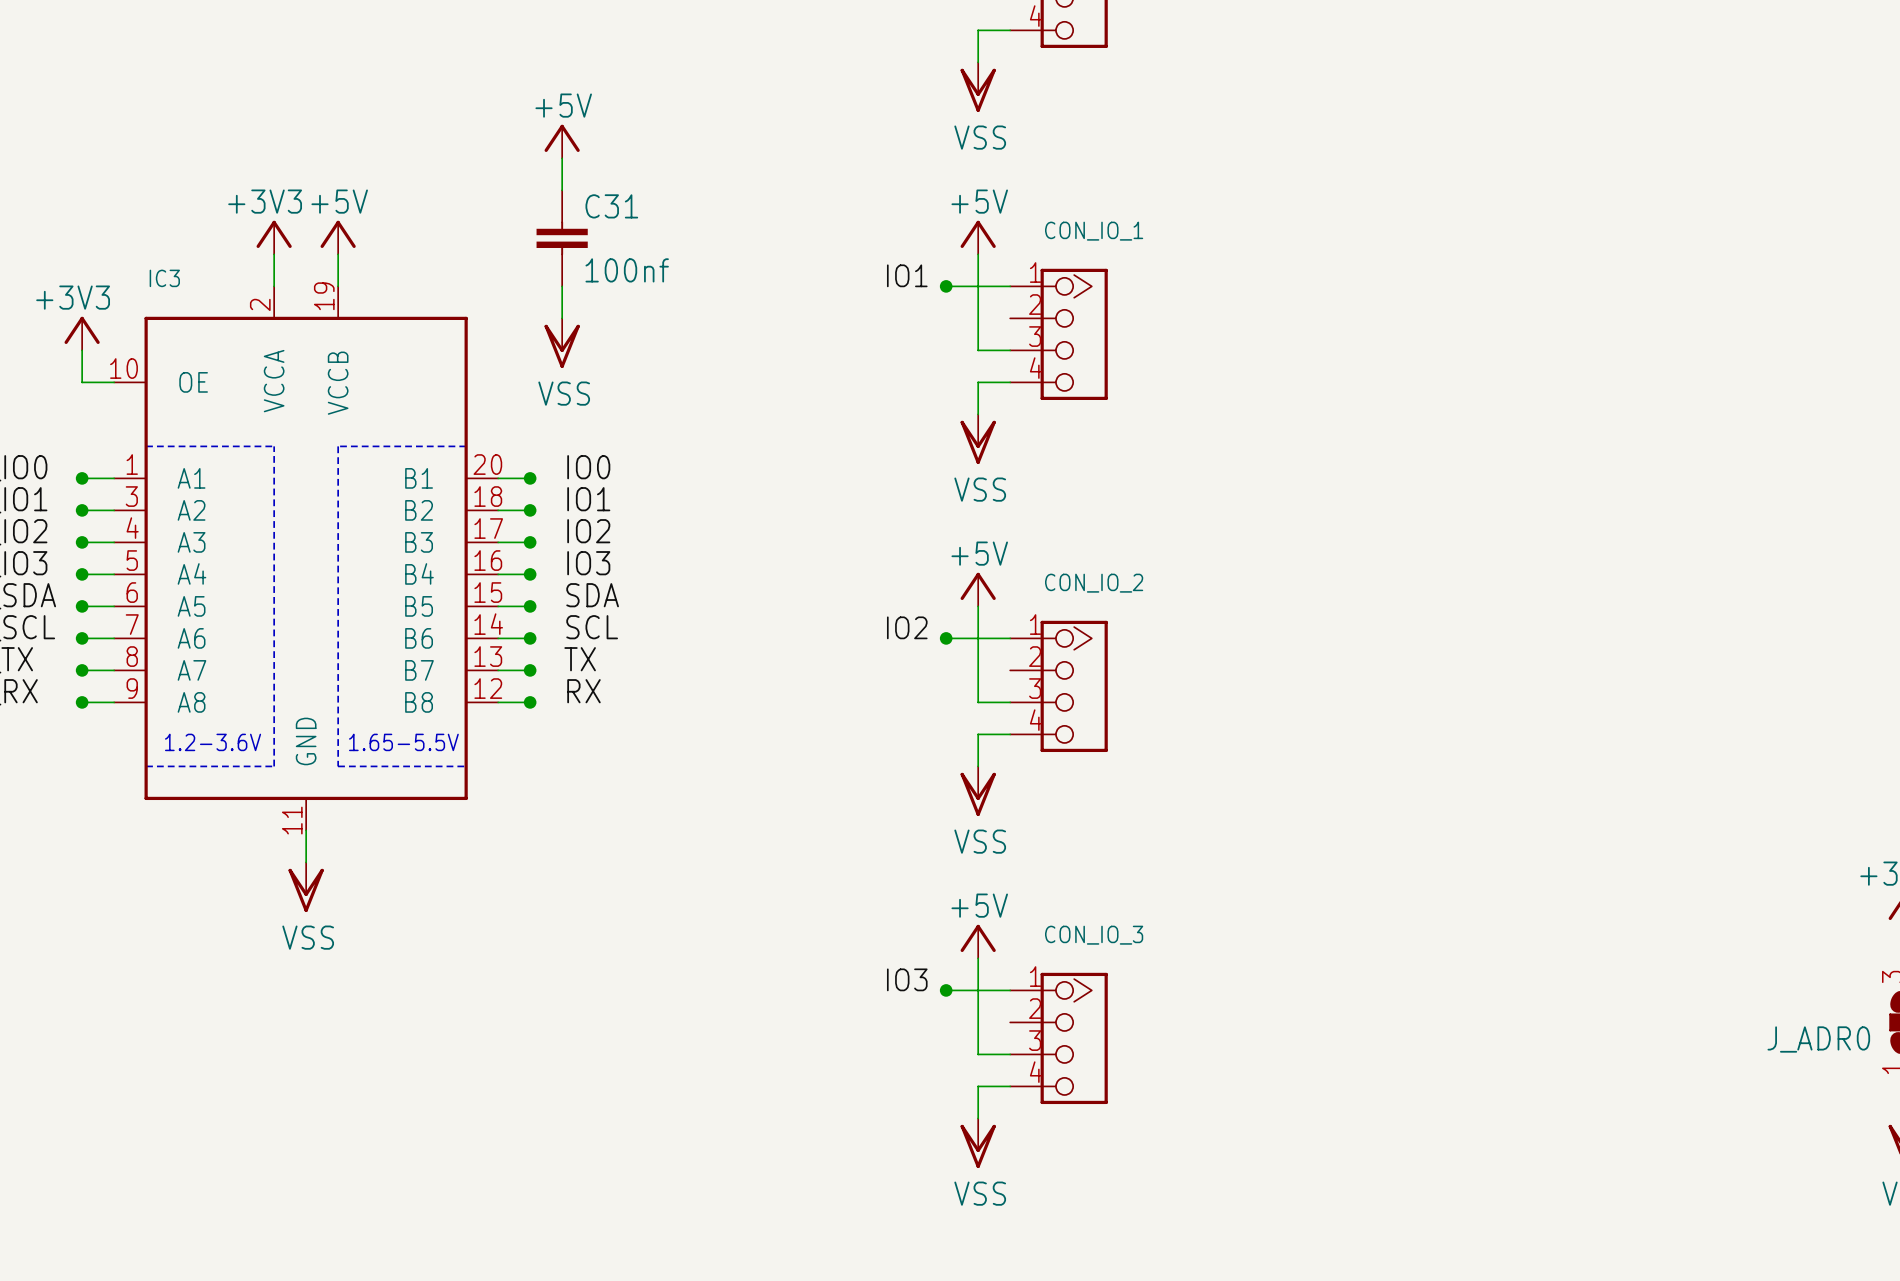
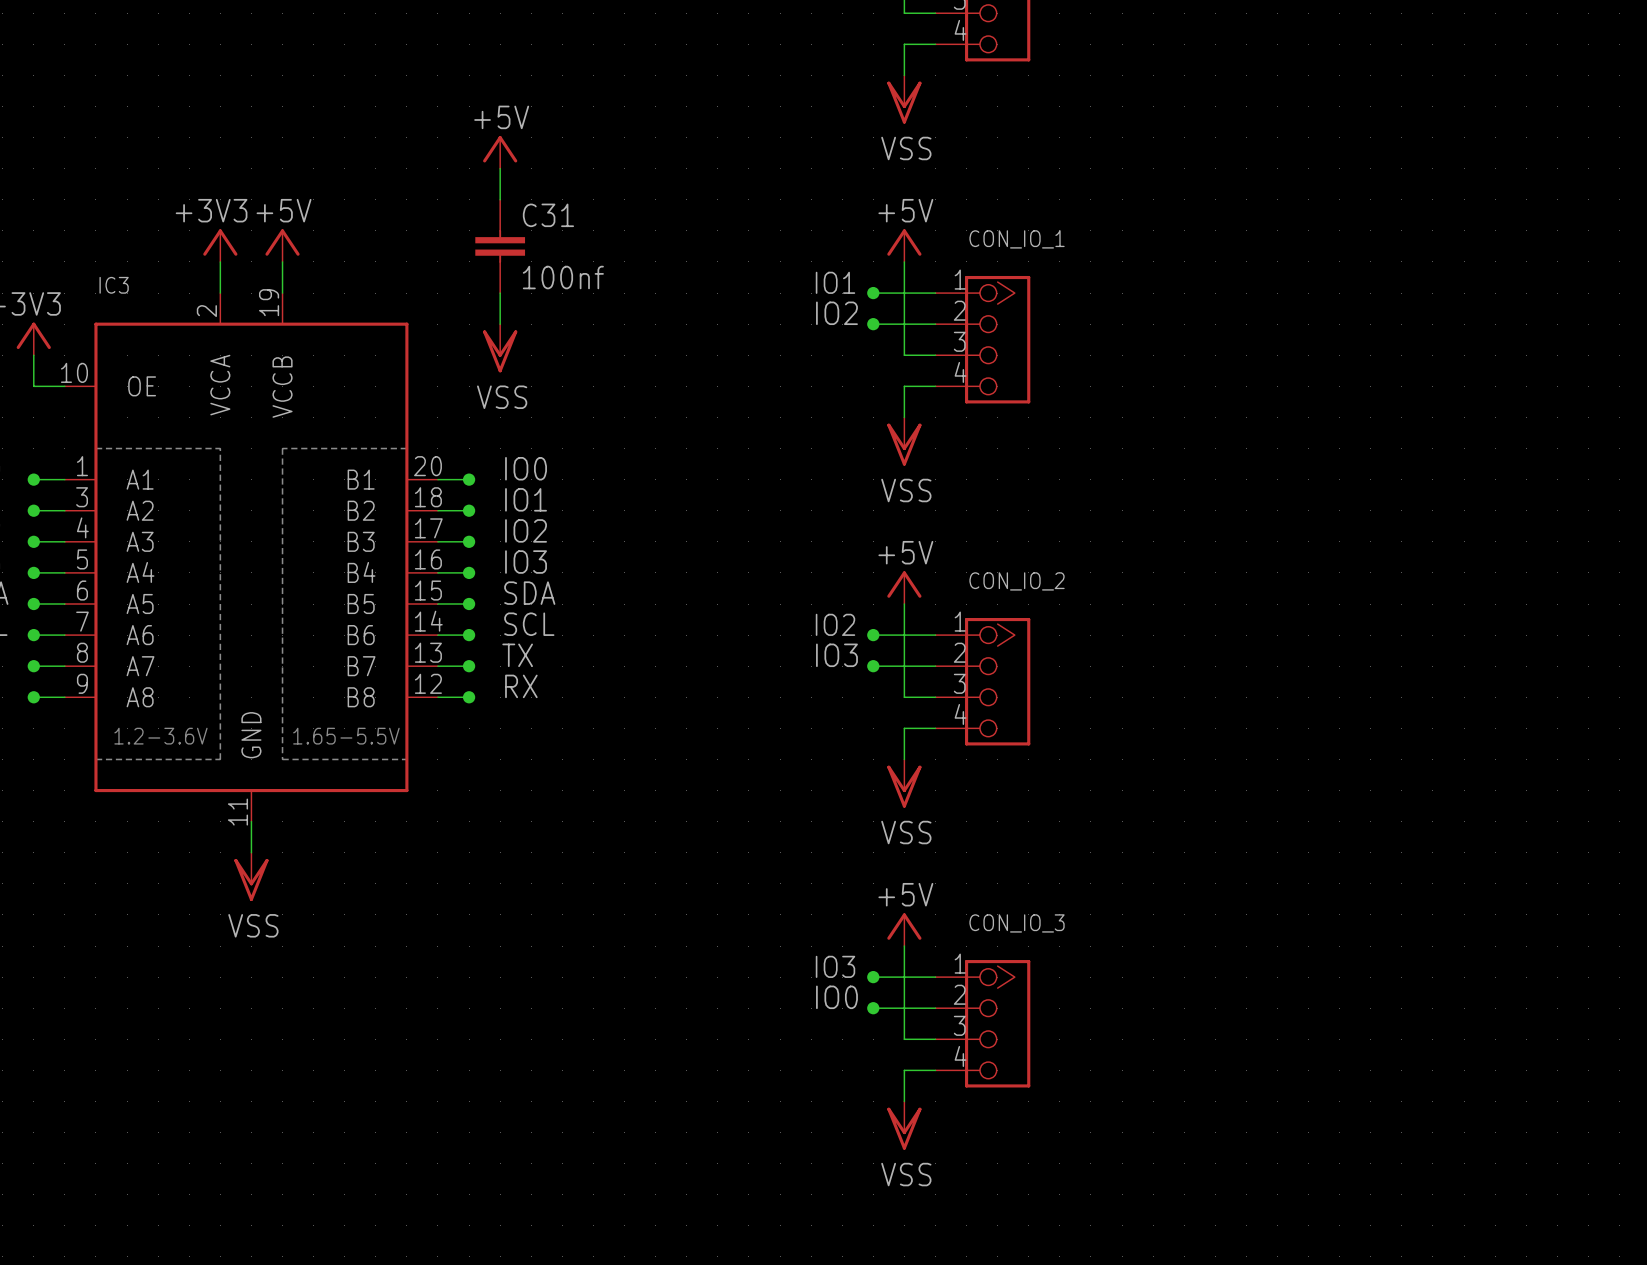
label: none -> IO2 (836, 313)
wire: none -> (873, 324) (935, 324)
junction: none -> (873, 324)
label: none -> IO3 (836, 655)
wire: none -> (873, 666) (935, 666)
junction: none -> (873, 666)
label: none -> IO0 (836, 997)
wire: none -> (873, 1008) (935, 1008)
junction: none -> (873, 1008)

